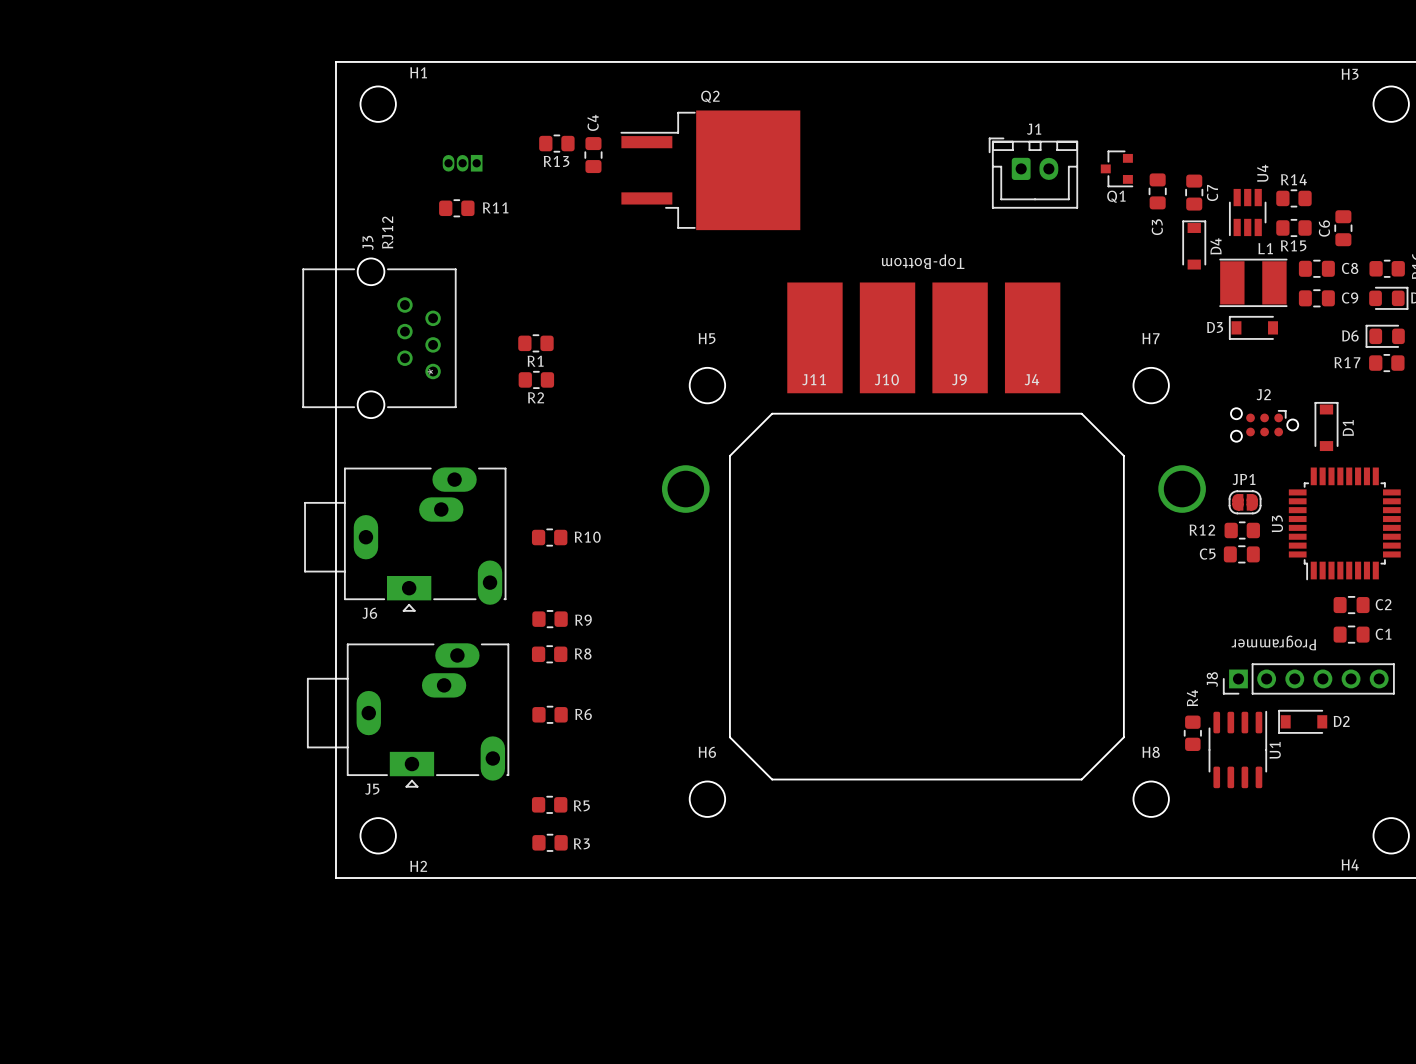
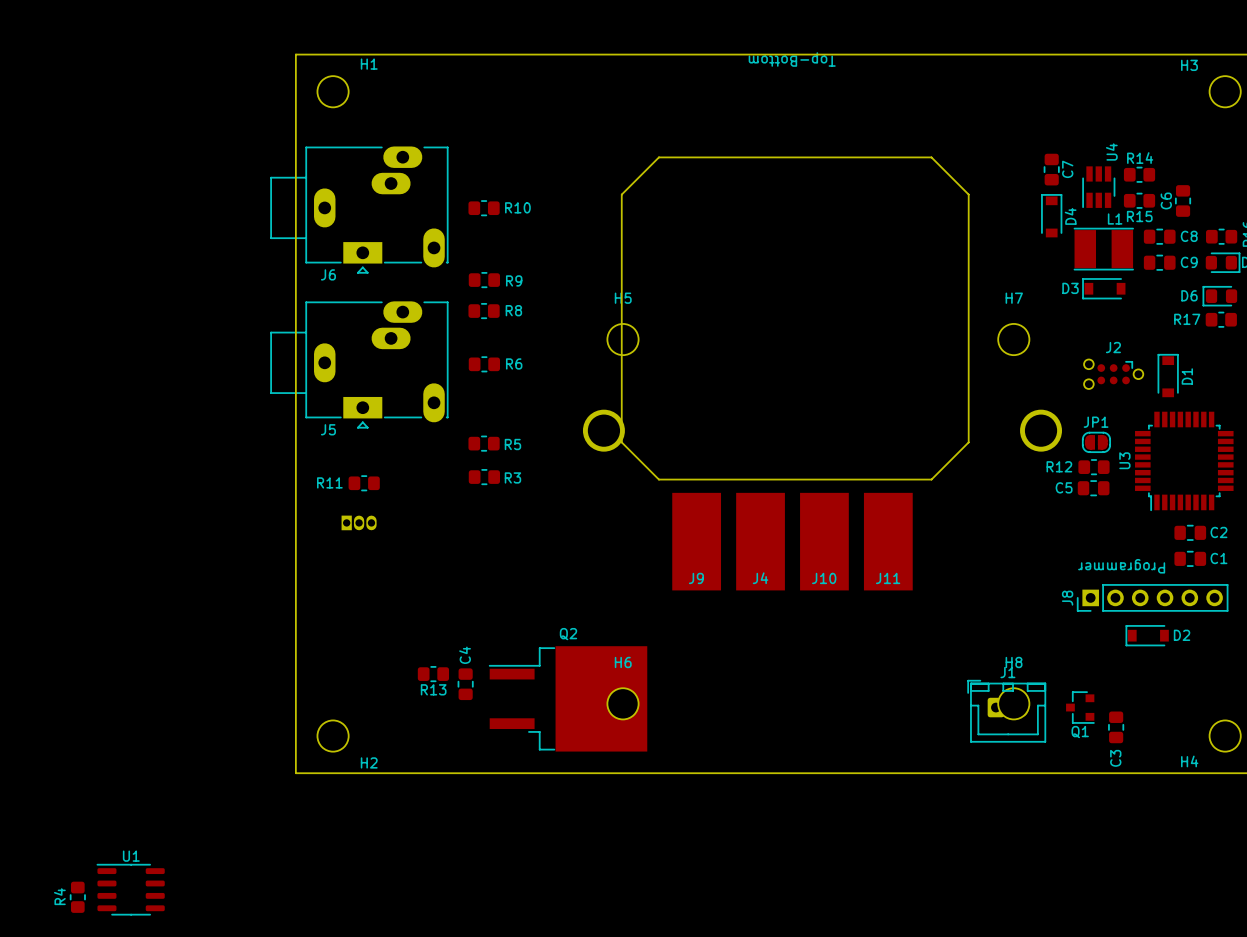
R13 position: (556, 143) -> (433, 674)
C4 position: (593, 155) -> (465, 684)
part: (462, 163) -> none
Q1 position: (1116, 168) -> (1080, 707)
Q2 position: (710, 170) -> (568, 698)
J1 position: (1033, 173) -> (1006, 711)
C3 position: (1157, 191) -> (1116, 727)
R11 name position: R11 (495, 207) -> R11 (329, 482)
R11 position: (456, 208) -> (364, 483)
text position: Top-Bottom (923, 261) -> Top-Bottom (792, 59)
J11 position: (814, 337) -> (888, 541)
J10 position: (887, 337) -> (824, 541)
J9 position: (960, 337) -> (696, 541)
J4 position: (1032, 337) -> (760, 541)
J3: RJ12 (379, 338) -> none
R1: (535, 343) -> none
R2: (536, 379) -> none
board edge: (772, 413) (729, 455) (729, 737) (772, 779) (1081, 779) (1123, 737) (1123, 455) (1081, 413) (772, 413) -> (658, 157) (621, 194) (621, 442) (658, 479) (931, 479) (968, 442) (968, 194) (931, 157) (658, 157)
R10 position: (549, 537) -> (484, 208)
J6 position: (405, 539) -> (359, 209)
part: none -> (359, 522)
R9 position: (550, 619) -> (484, 280)
R8 position: (549, 654) -> (484, 311)
R4 name position: R4 (1192, 698) -> R4 (59, 896)
R6 position: (550, 714) -> (484, 364)
J5 position: (408, 715) -> (359, 364)
R4 position: (1192, 733) -> (77, 897)
U1 rotation: 0° (1237, 749) -> 90° counterclockwise (130, 889)
U1 position: (1237, 749) -> (130, 889)
R5 position: (549, 804) -> (484, 443)
R3 position: (550, 842) -> (484, 477)

